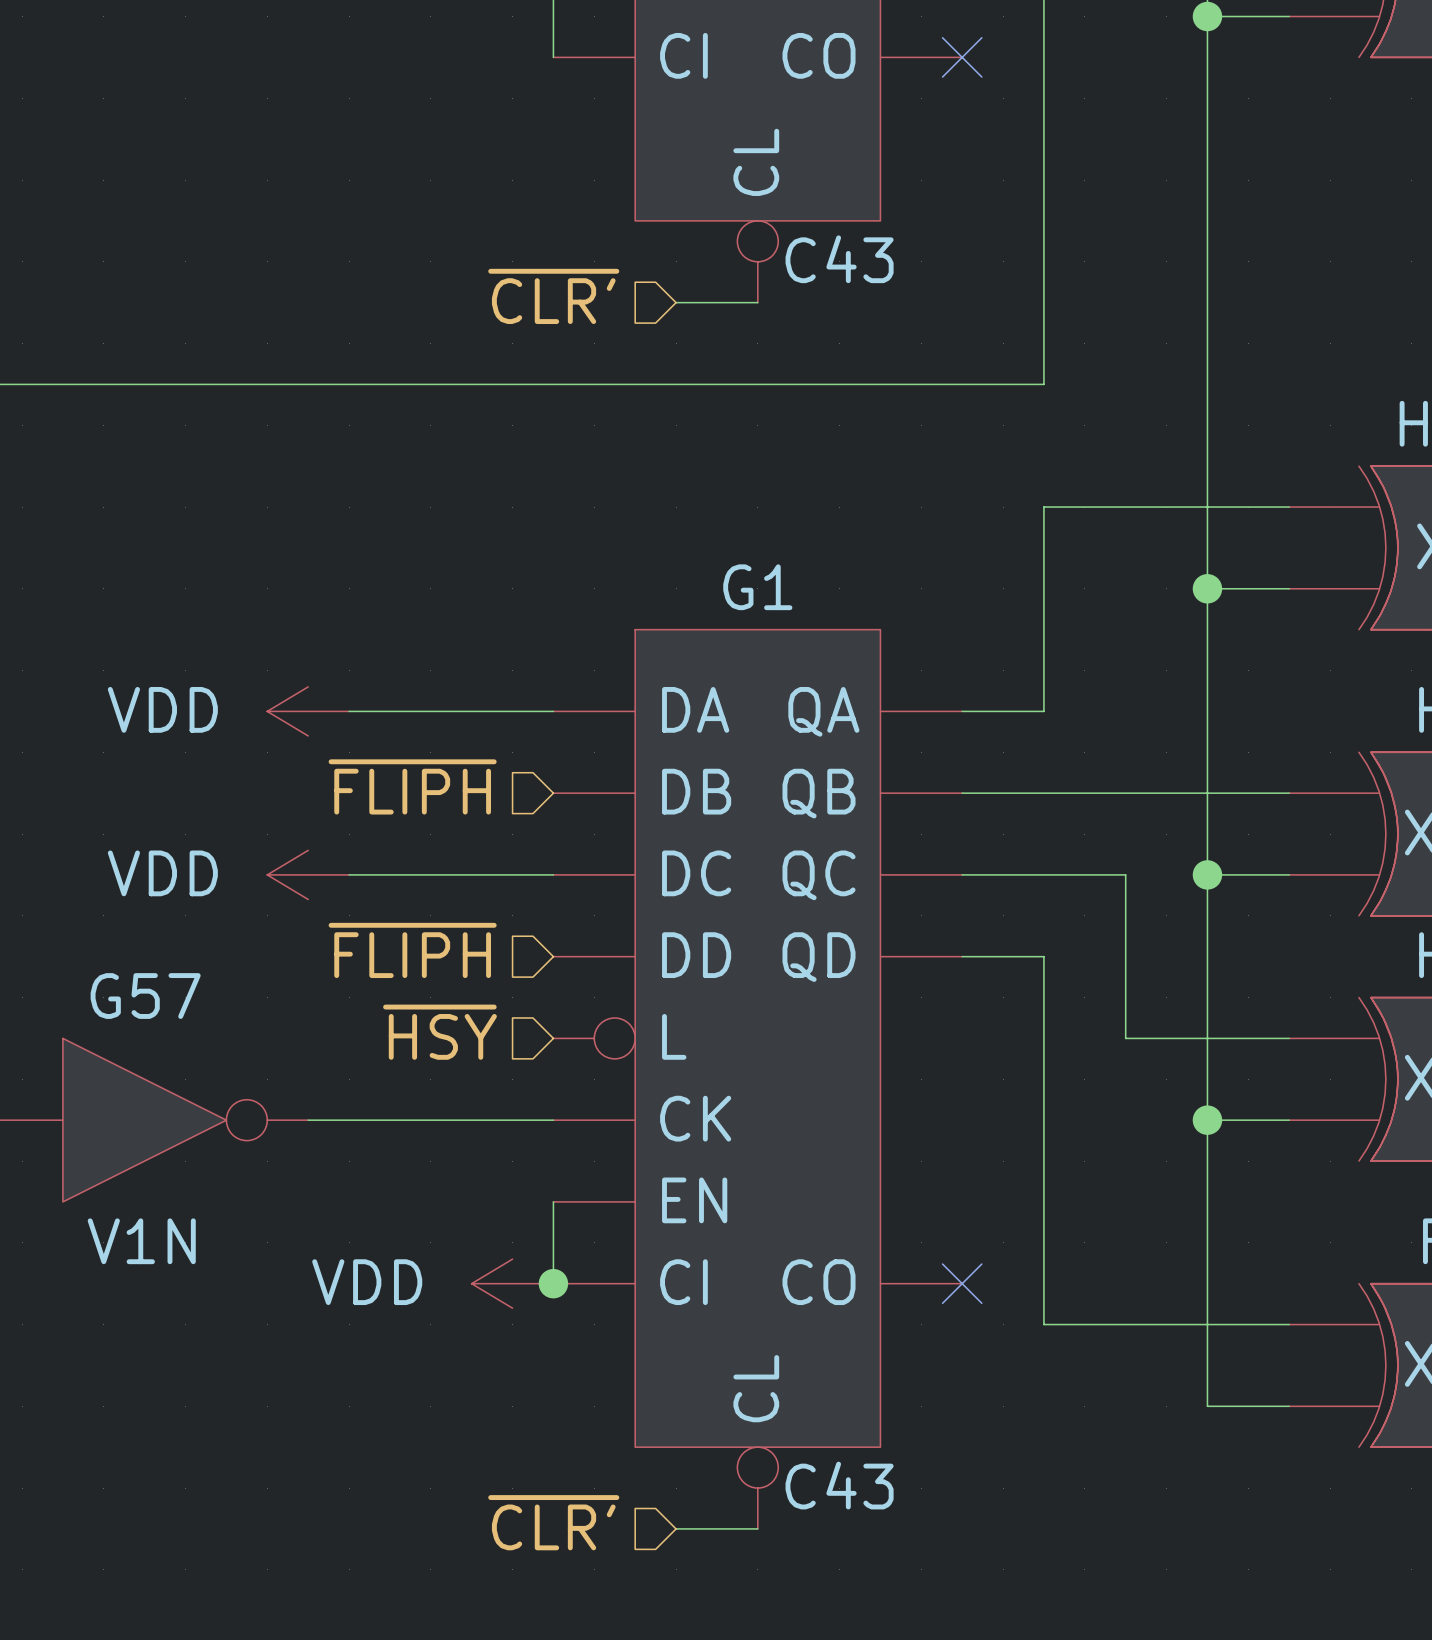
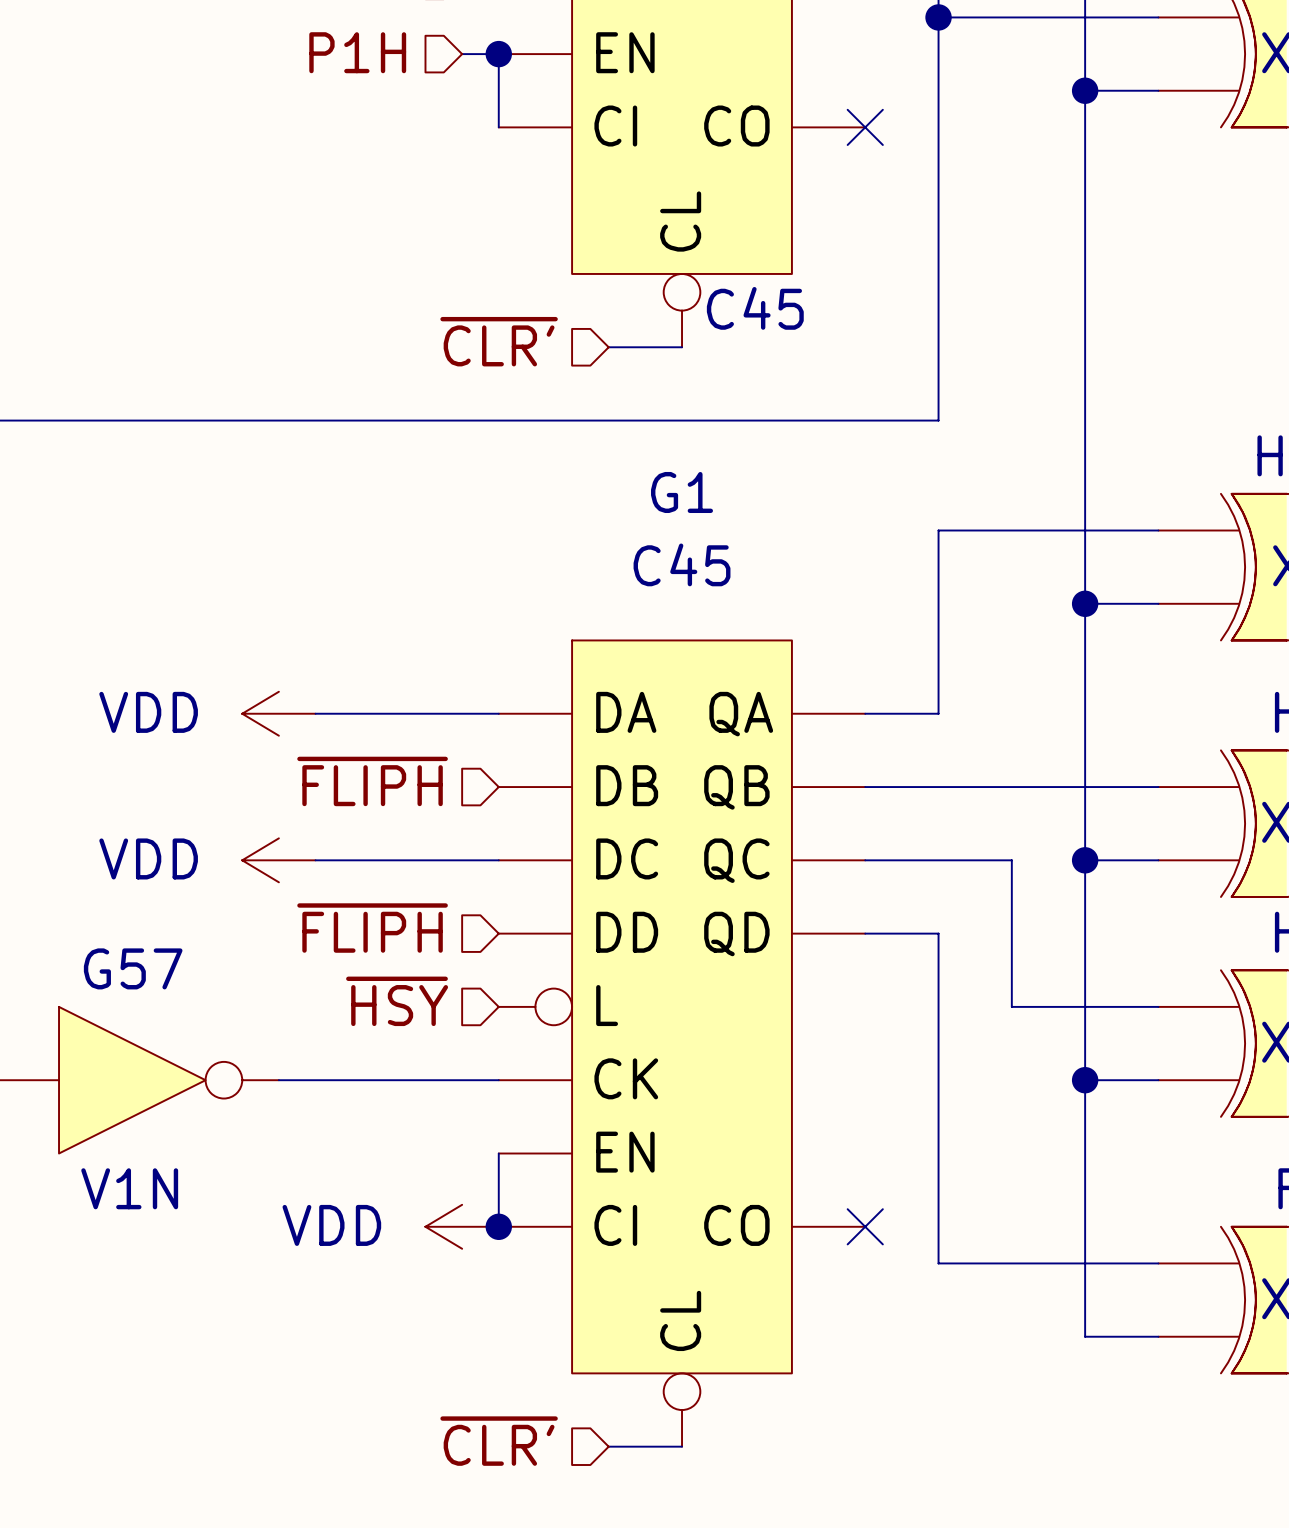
part value: C43 (839, 259) -> C45 (755, 308)
G1 name position: G1 (757, 587) -> G1 (682, 492)
G1 value: C43 (839, 1485) -> C45 (682, 564)

